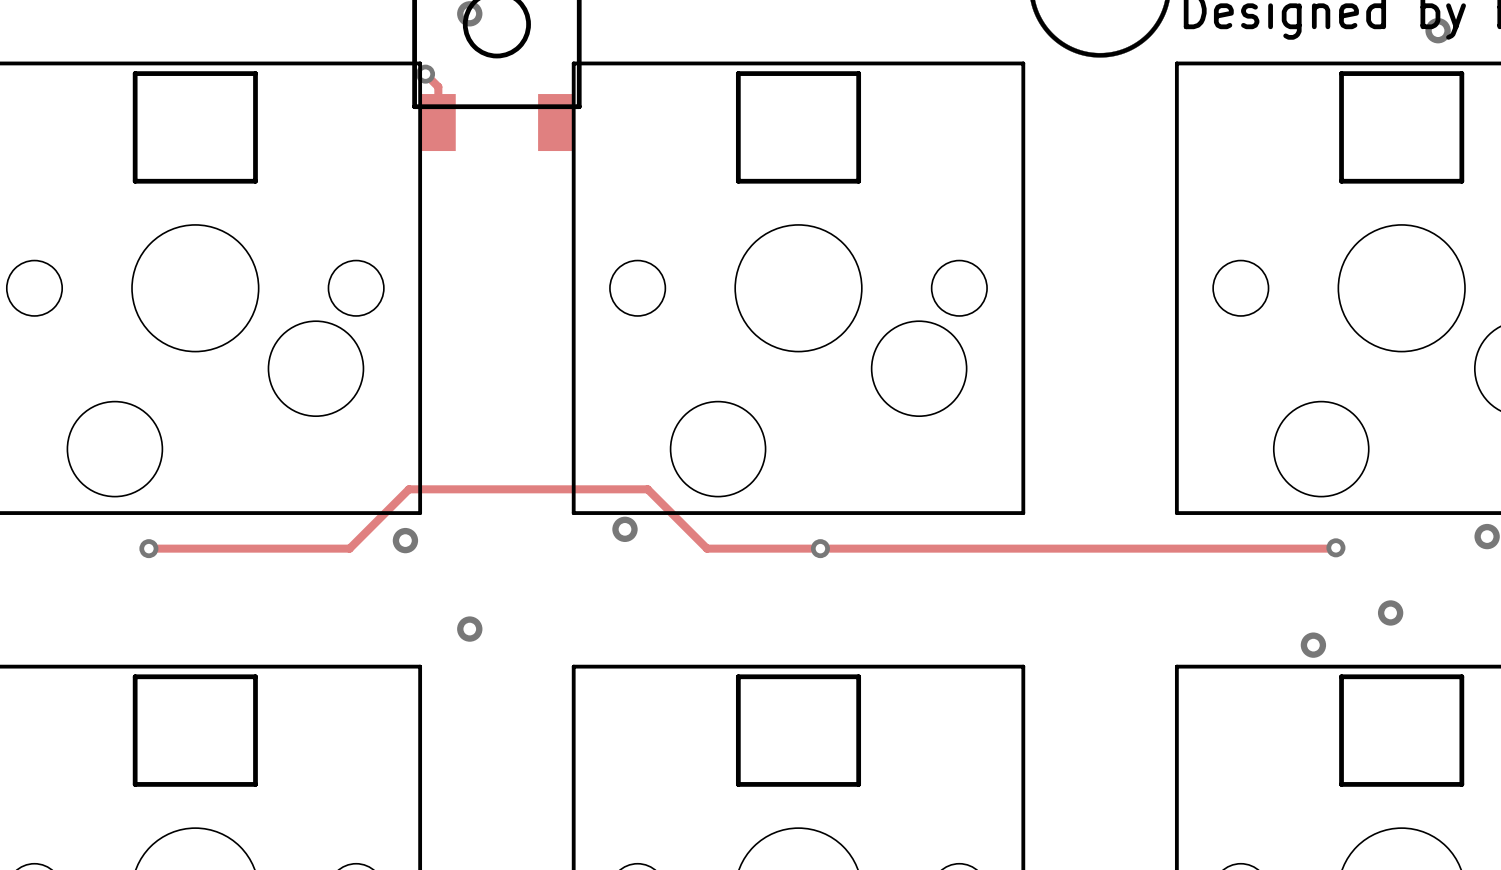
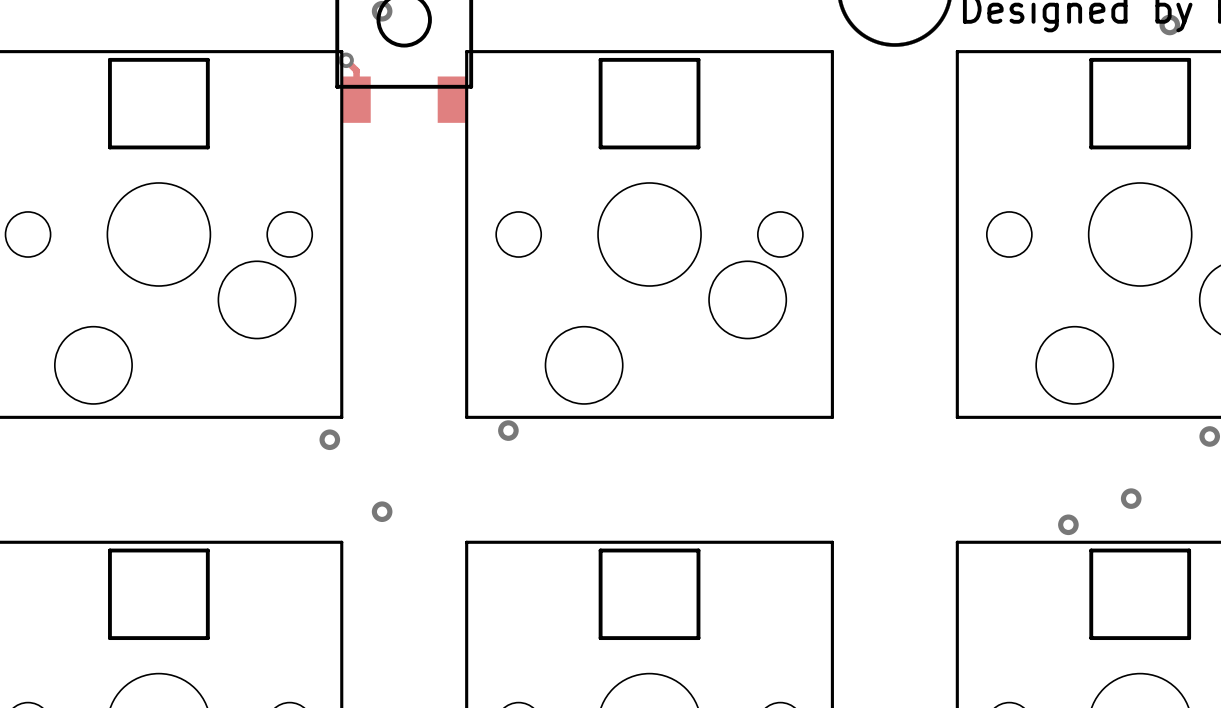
track: (1335, 547) (707, 548) (647, 489) (408, 489) (349, 548) (148, 548) -> none
via: (1335, 547) -> none
via: (148, 548) -> none
via: (820, 548) -> none

